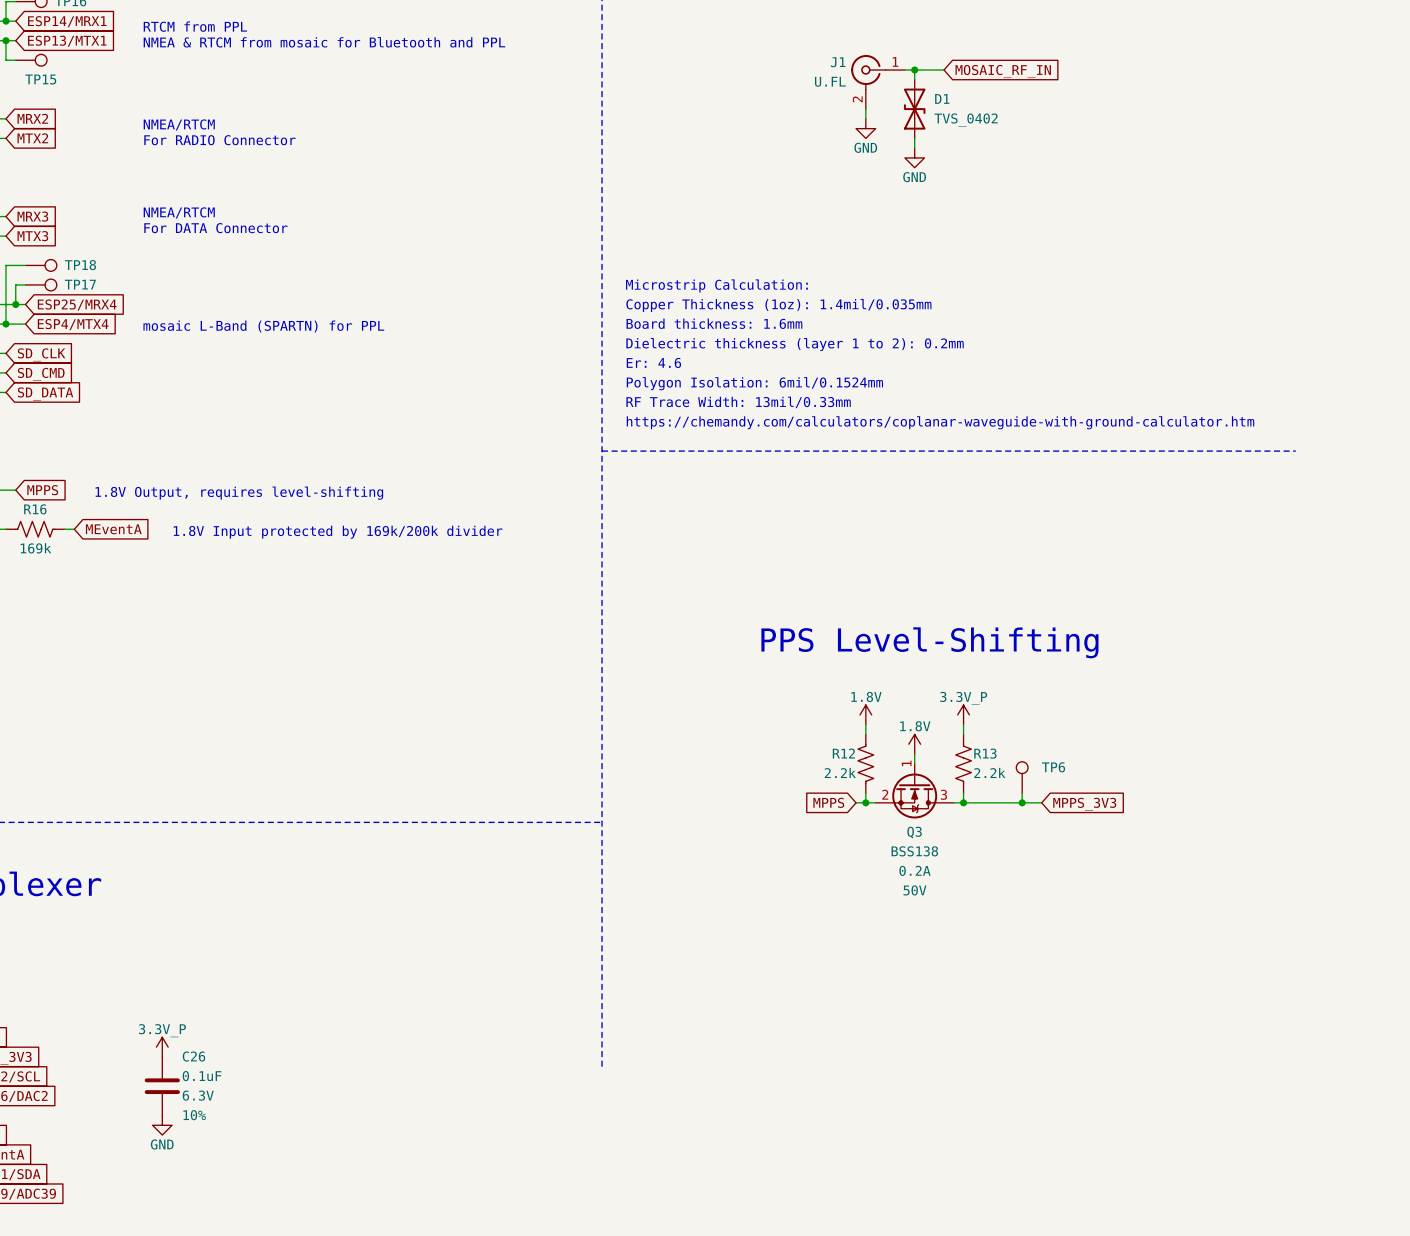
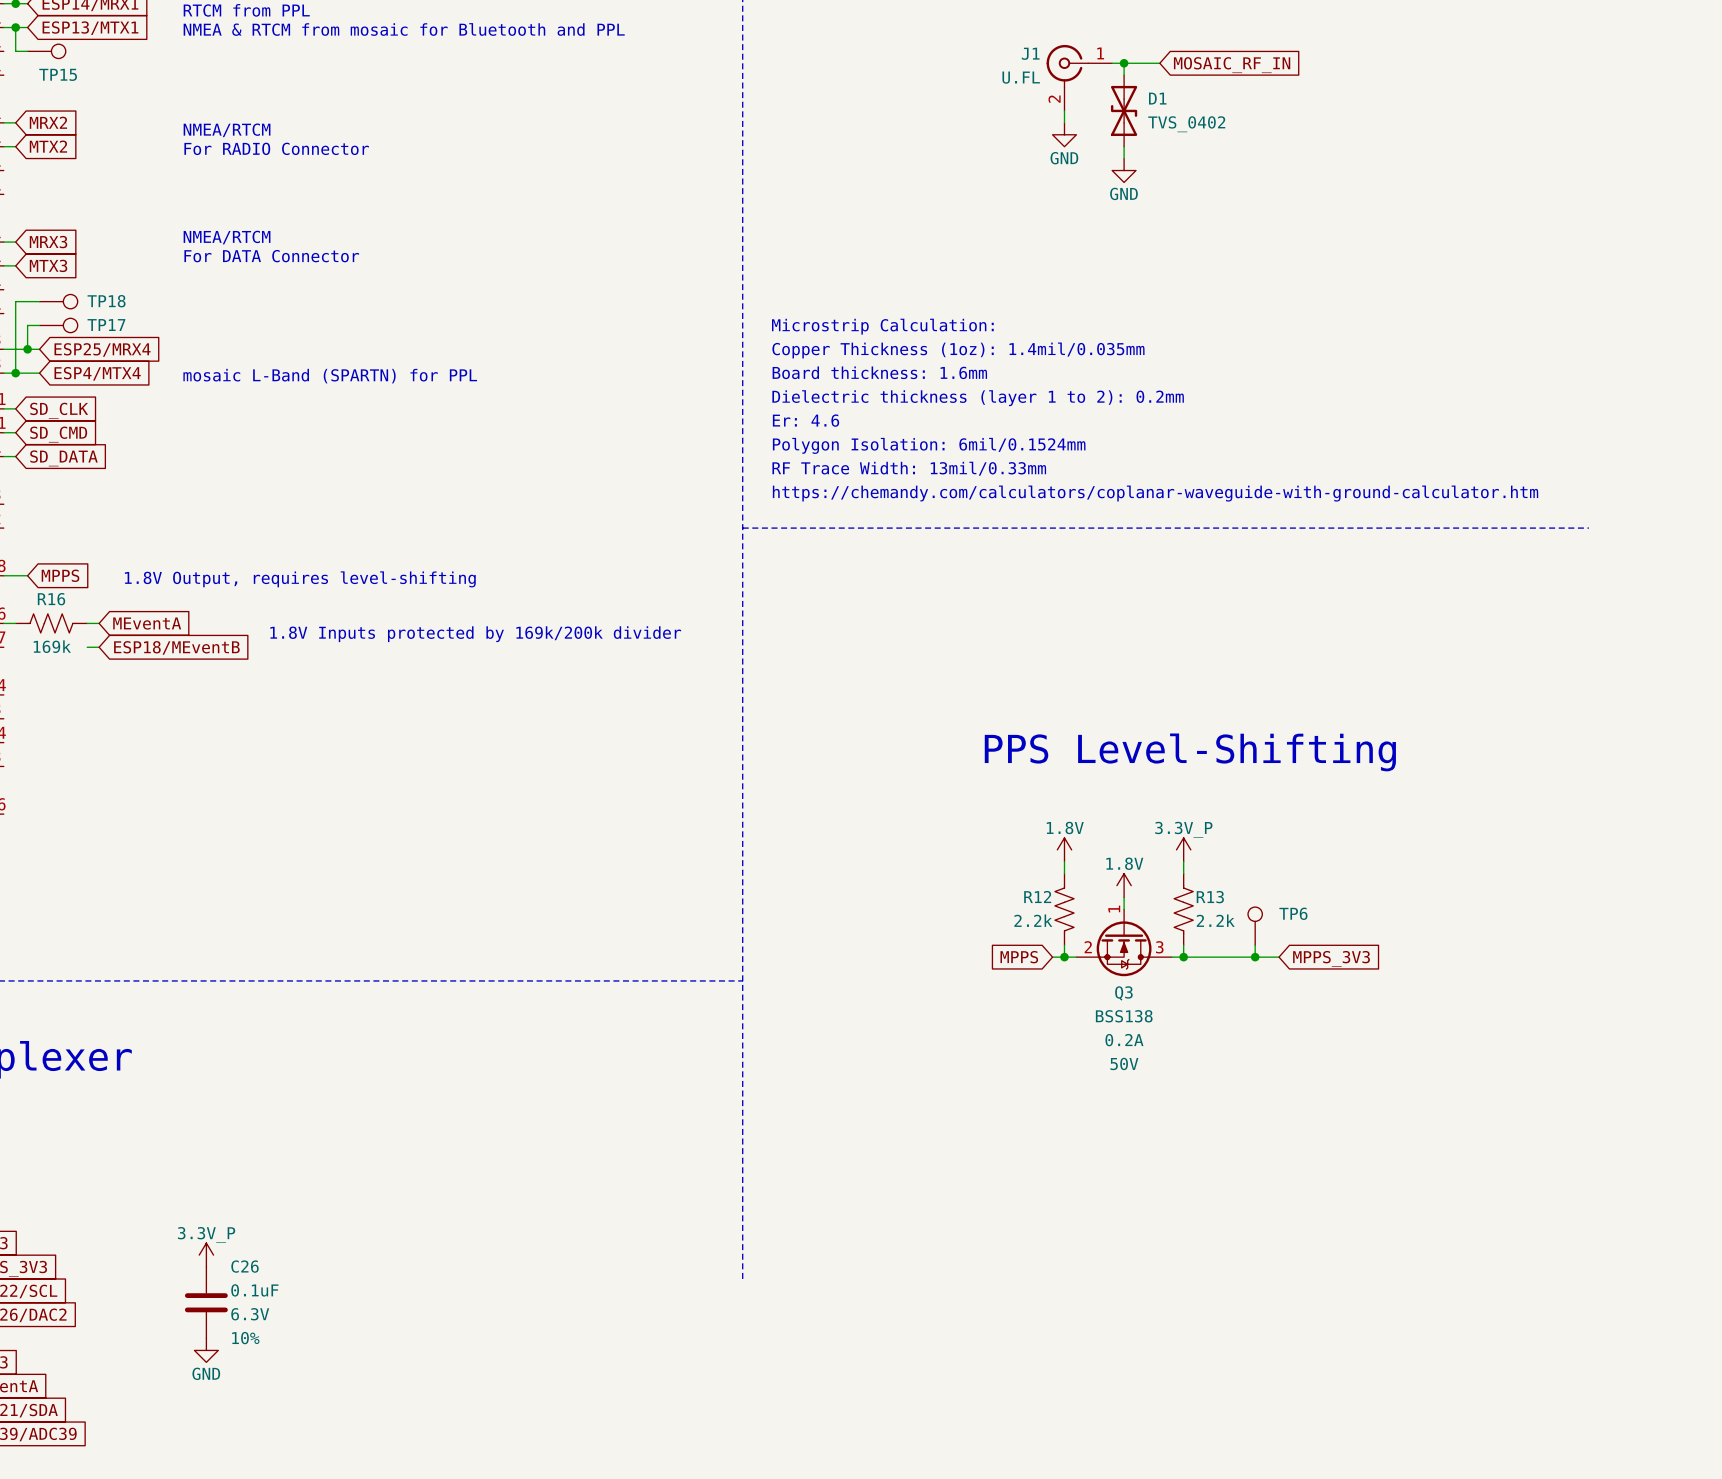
text: 1.8V Input protected by 169k/200k divider (338, 532) -> 1.8V Inputs protected by 169k/200k divider (475, 634)
wire: none -> (87, 647) (99, 647)
global label: none -> ESP18/MEventB (176, 647)
text position: PPS Level-Shifting (929, 642) -> PPS Level-Shifting (1190, 752)

